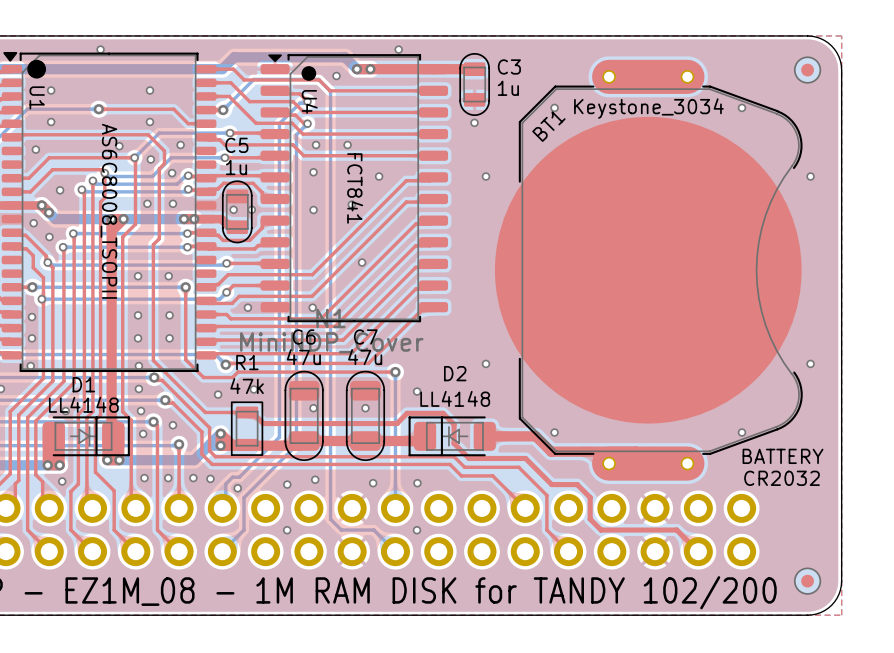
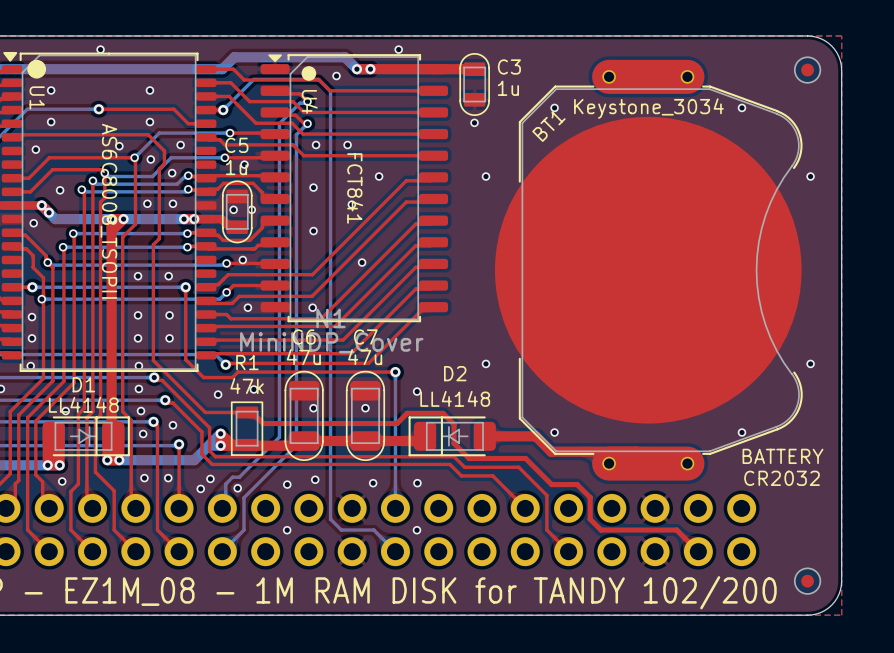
via: none -> (244, 164)
via: (313, 172) -> none
via: none -> (313, 187)
via: (313, 210) -> none
via: none -> (313, 231)
via: (49, 237) -> none
via: none -> (242, 260)
via position: (193, 478) -> (200, 488)

